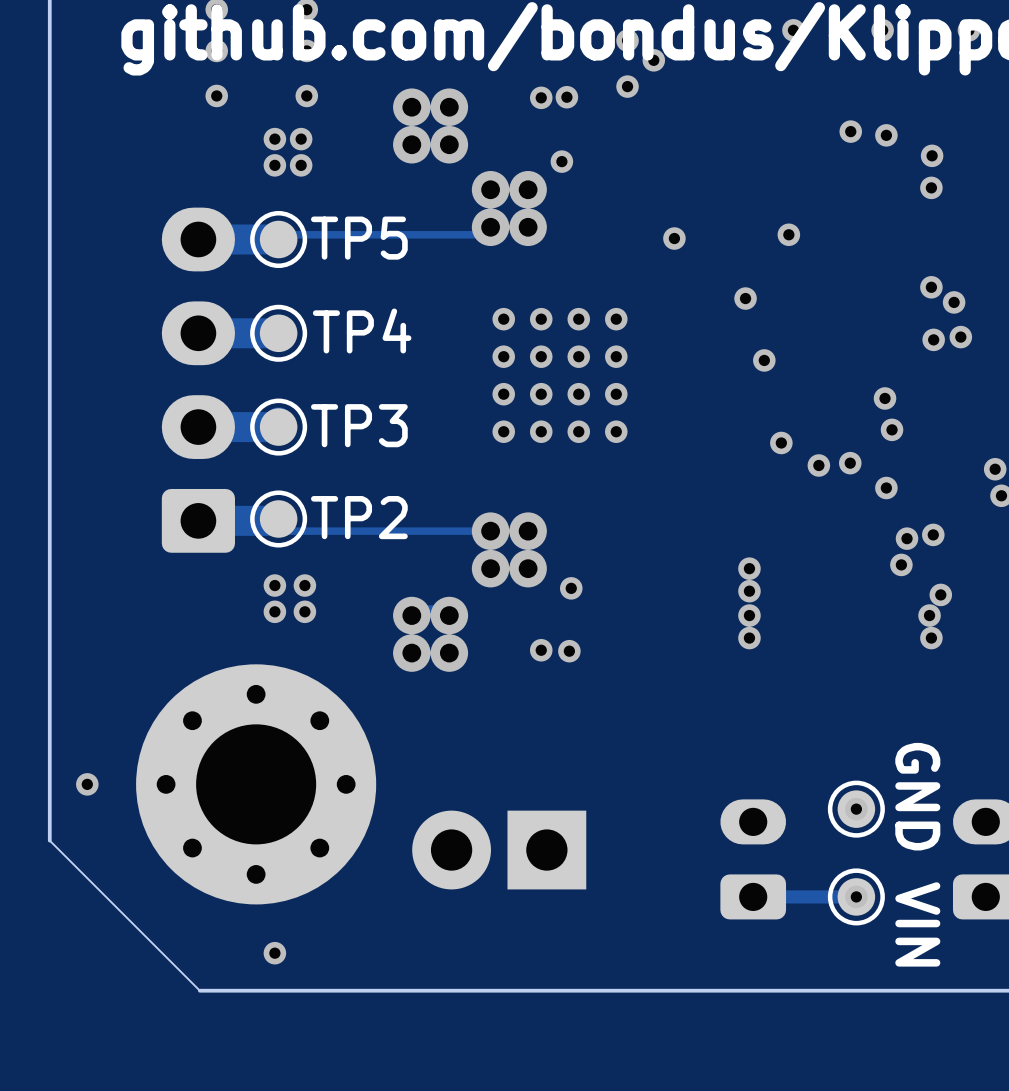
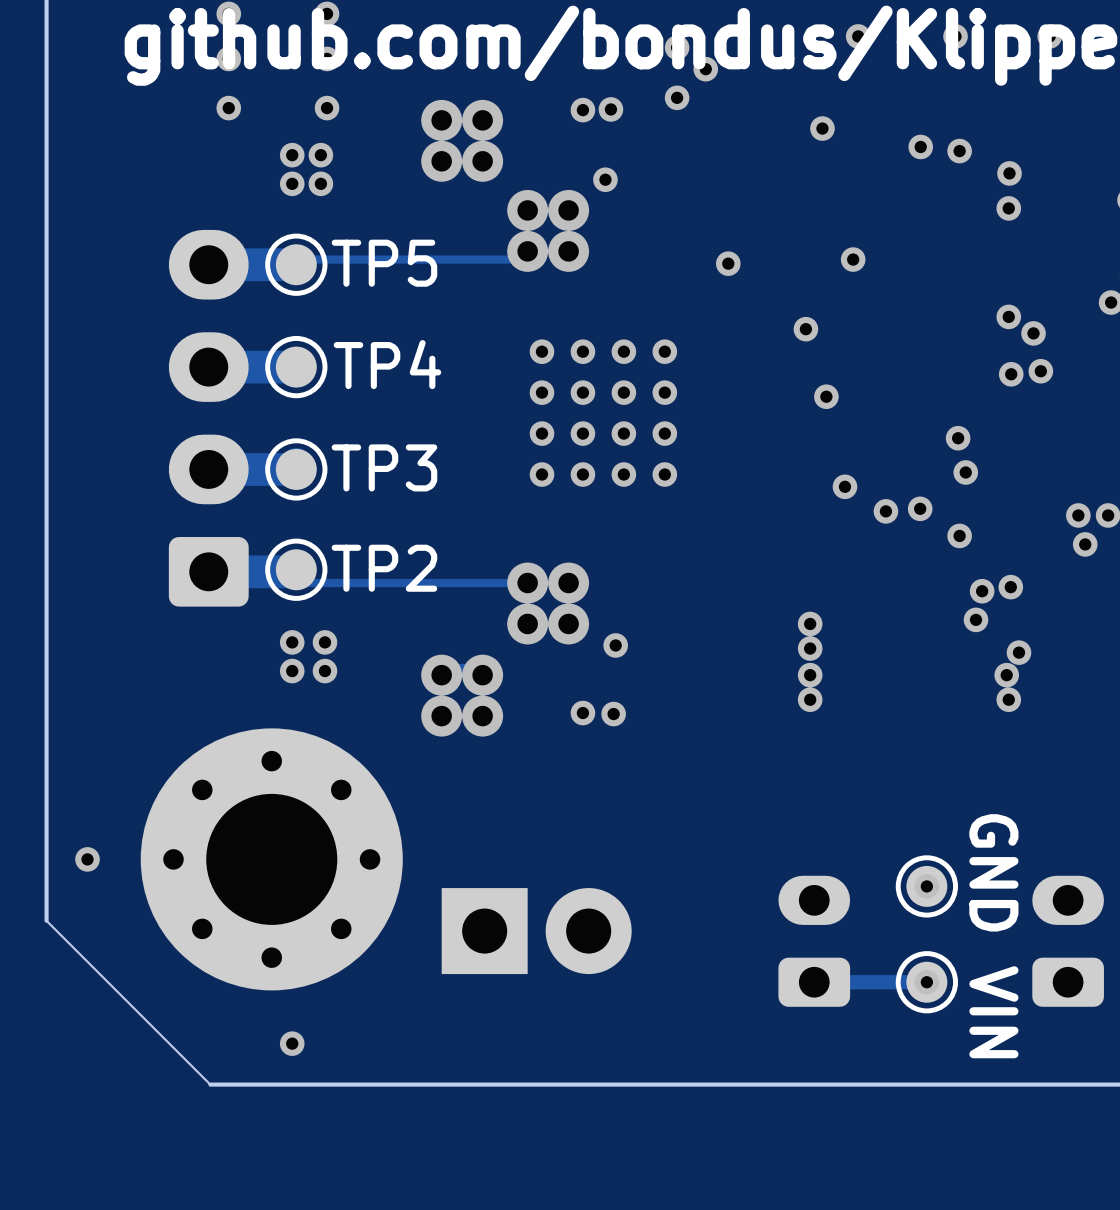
via: none -> (822, 128)
part rotation: 0° (499, 850) -> 180° (536, 931)

